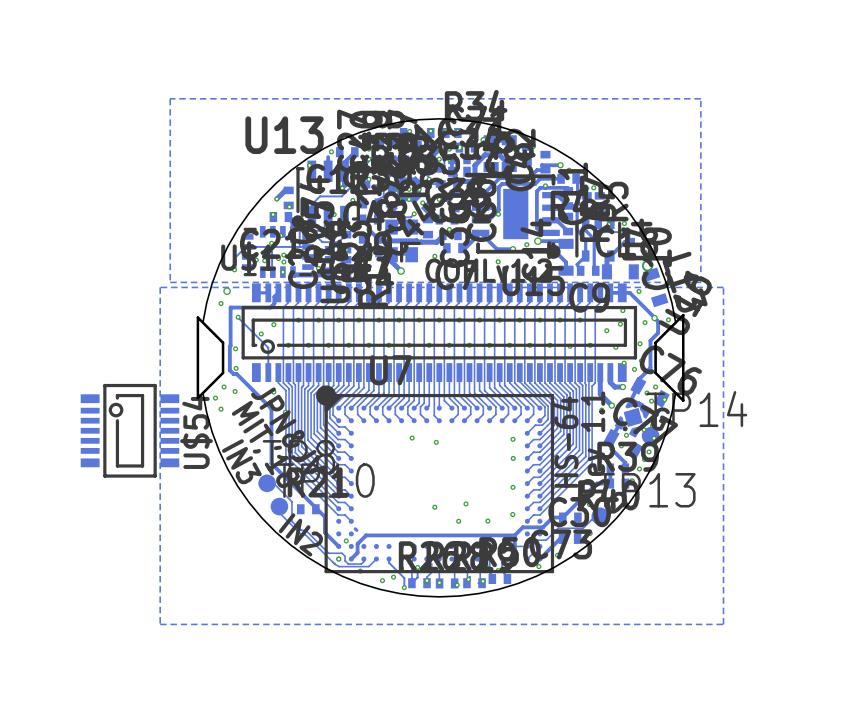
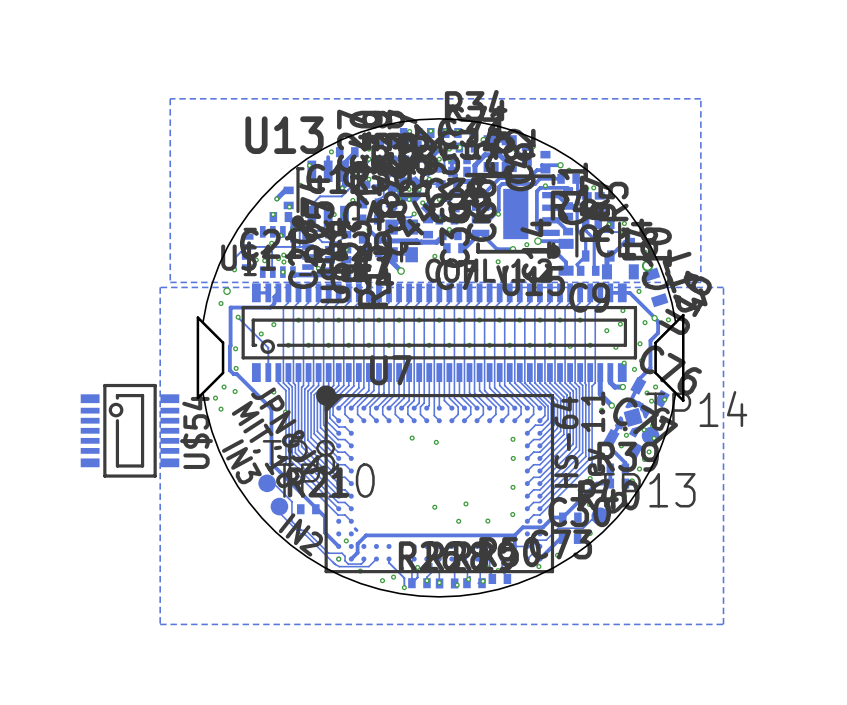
via: none -> (590, 478)

